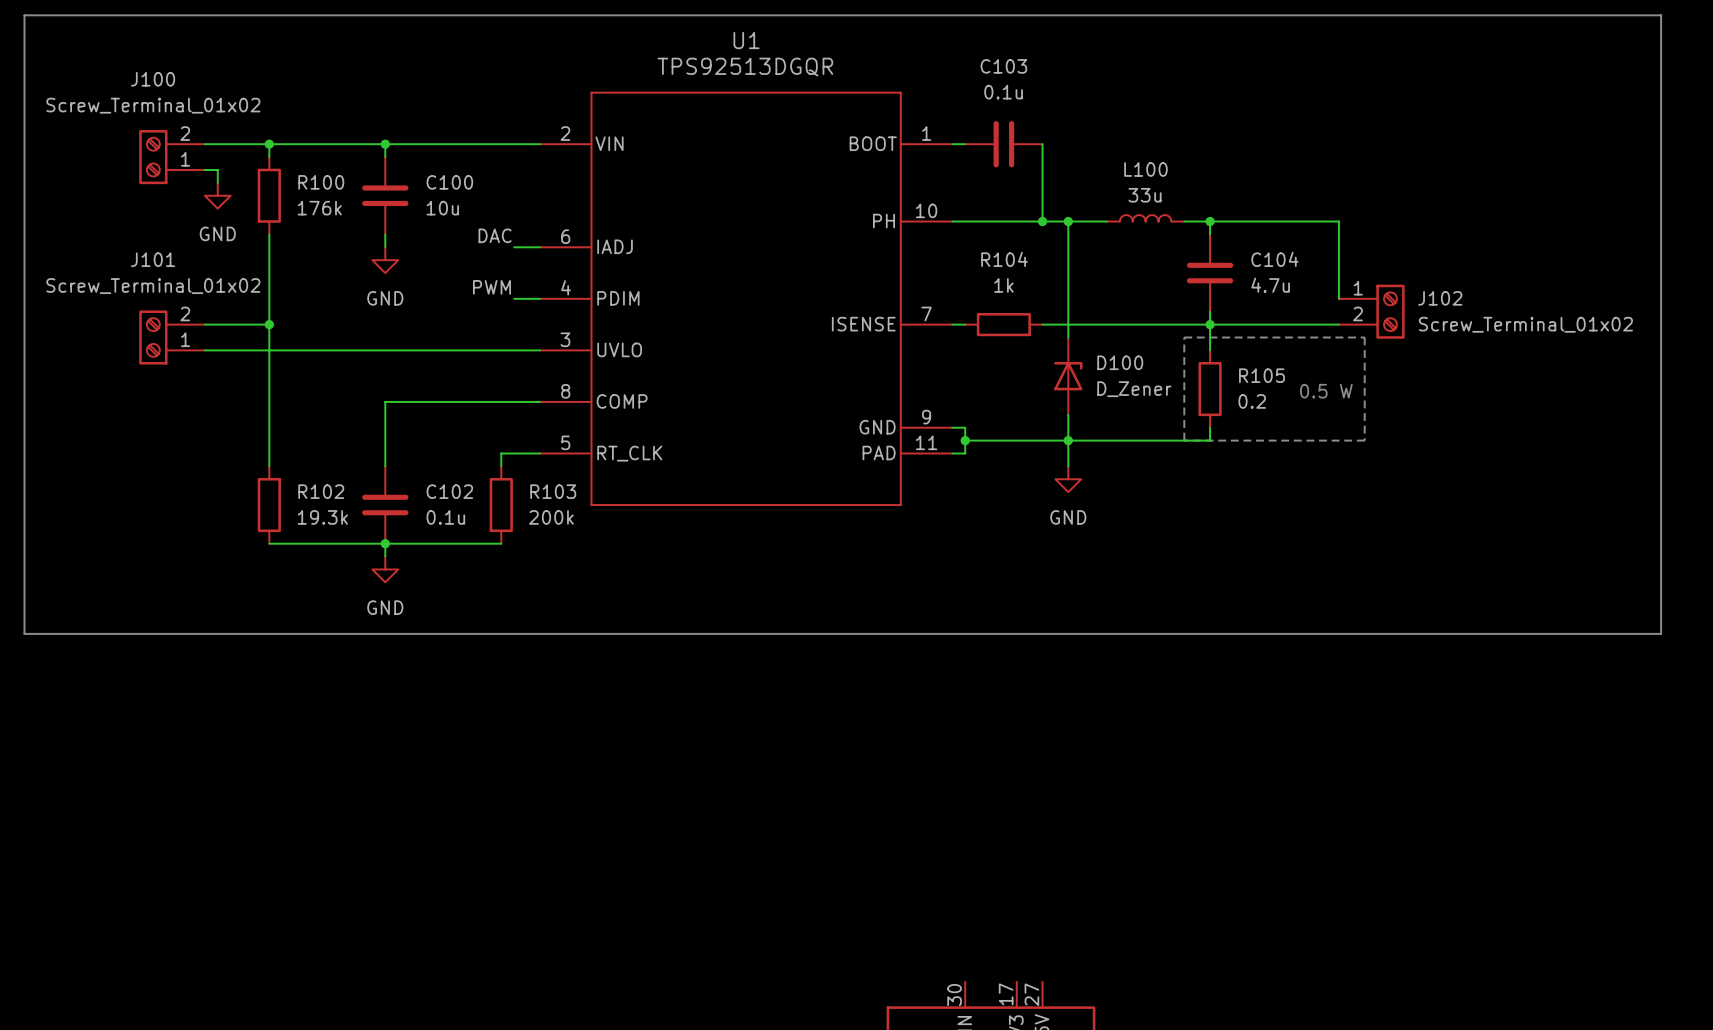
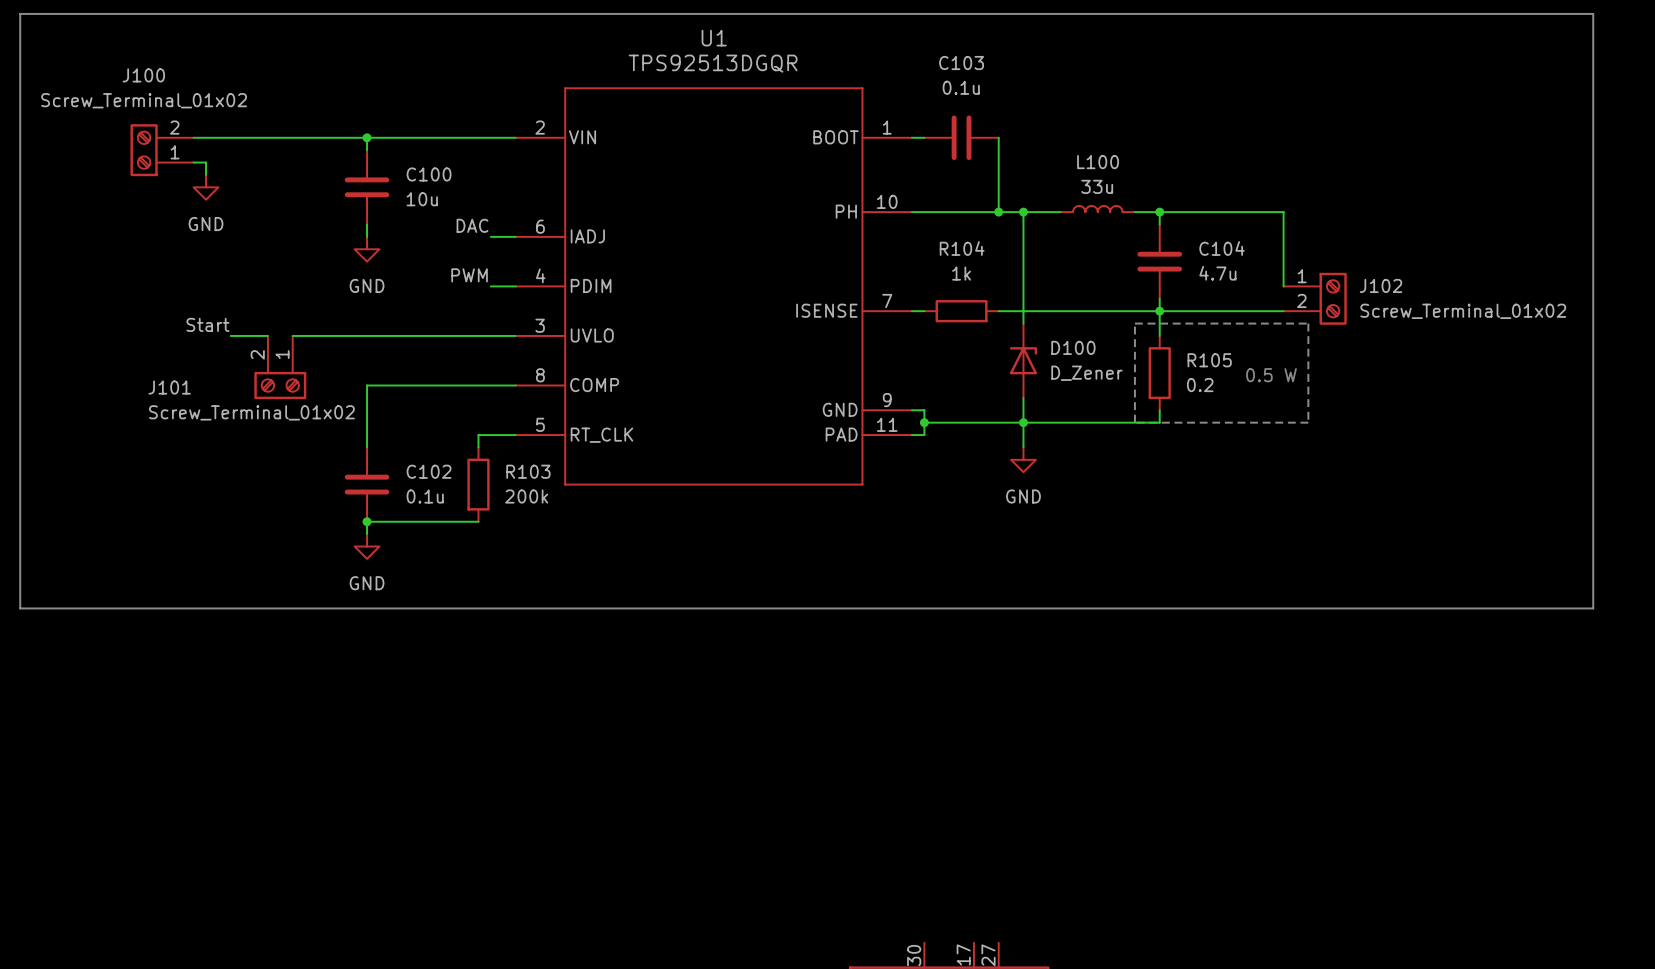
wire: (269, 144) (269, 157) -> none
junction: (269, 144) -> none
R100: 176k (269, 195) -> none
wire: (269, 234) (269, 466) -> none
J101 name position: J101 (153, 259) -> J101 (169, 387)
J101 value position: Screw_Terminal_01x02 (153, 286) -> Screw_Terminal_01x02 (251, 412)
wire: (204, 324) (269, 324) -> none
junction: (269, 324) -> none
J101 rotation: 0° (153, 337) -> 90° counterclockwise (280, 385)
J101 position: (172, 337) -> (280, 367)
label: none -> Start (207, 324)
wire: (204, 350) (243, 350) -> none
wire: (282, 350) (307, 350) -> none
R102: 19.3k (269, 505) -> none
wire: (269, 543) (385, 543) -> none

